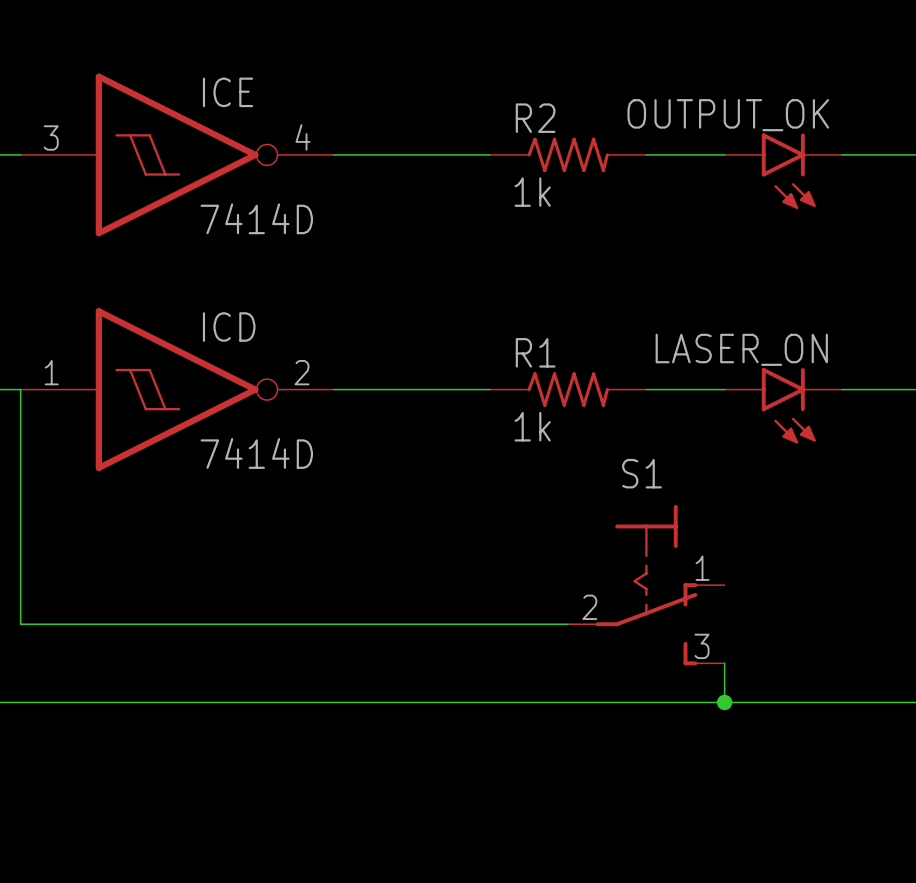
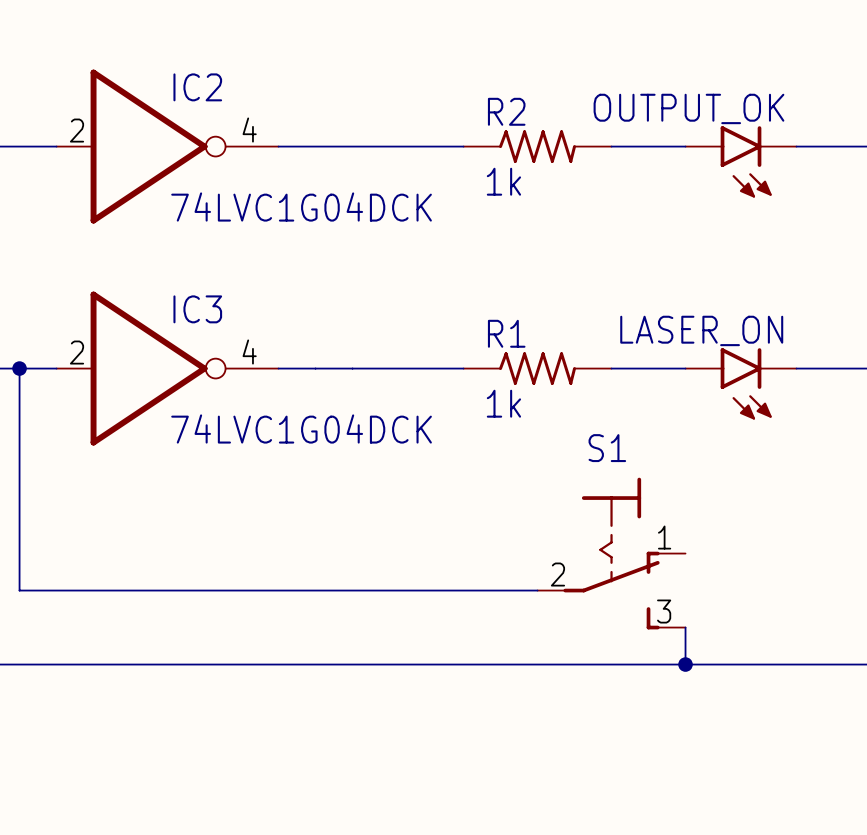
ICE: 7414D (177, 154) -> none
IC2: none -> 74LVC1G04DCK (167, 146)
junction: none -> (19, 368)
ICD: 7414D (177, 389) -> none
IC3: none -> 74LVC1G04DCK (167, 368)

